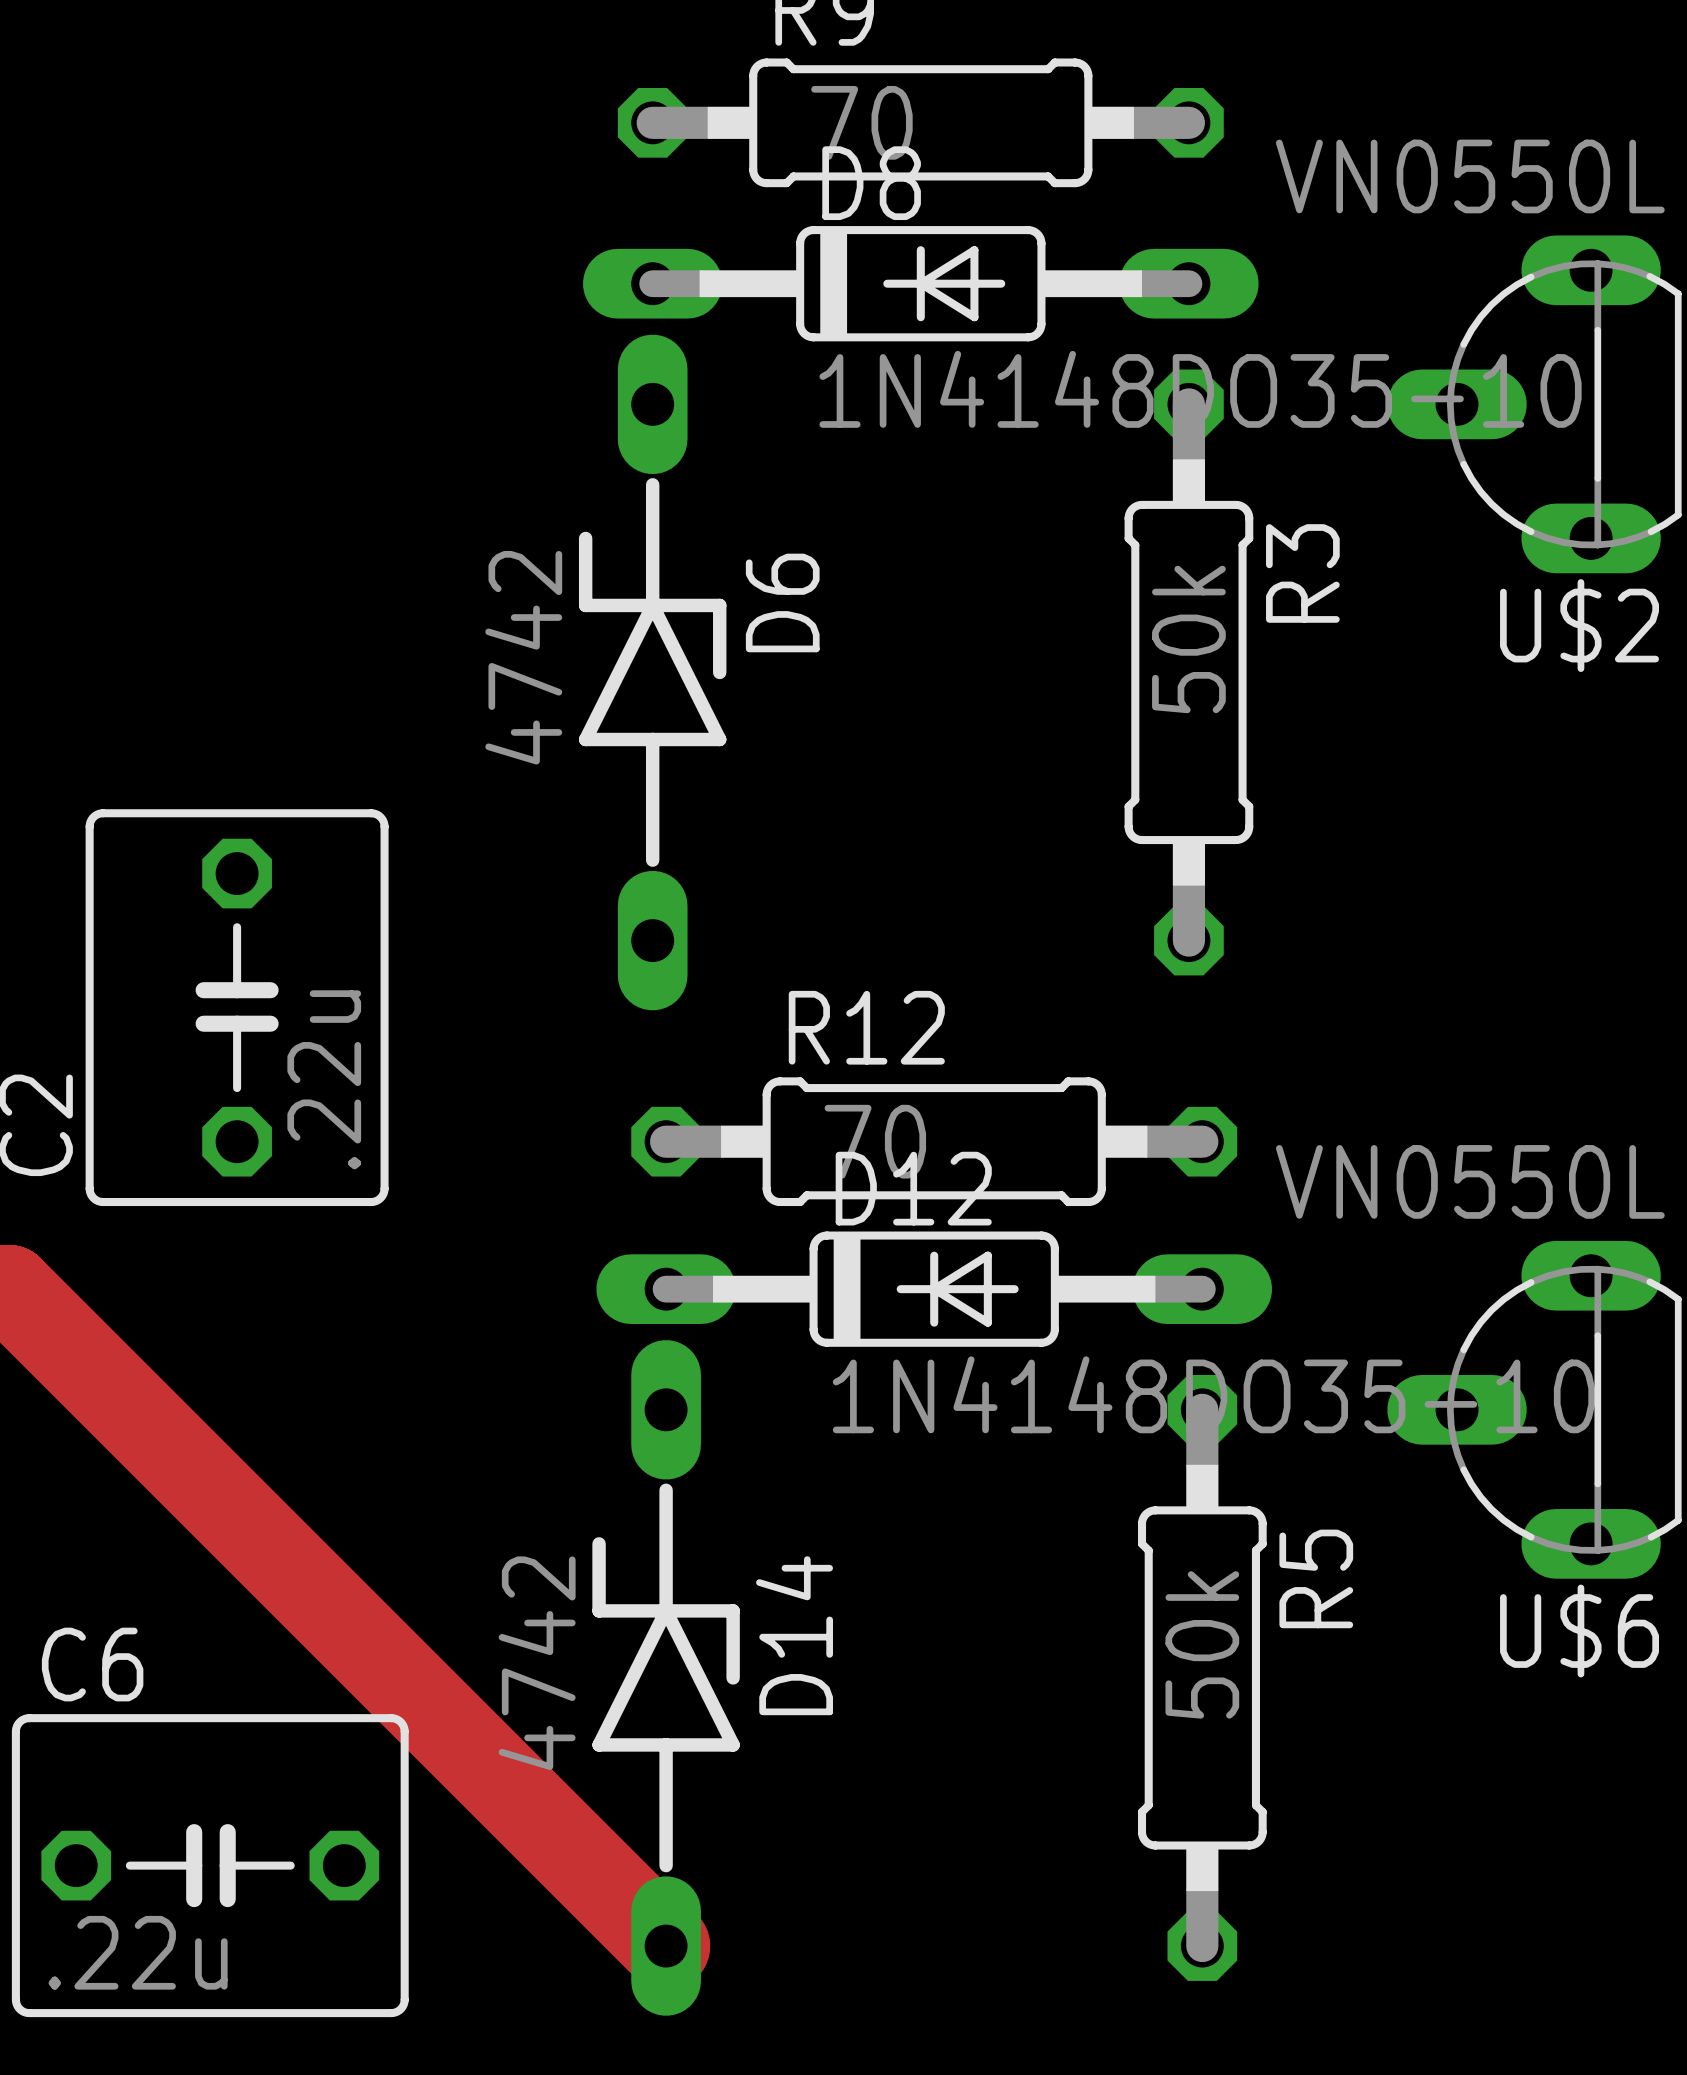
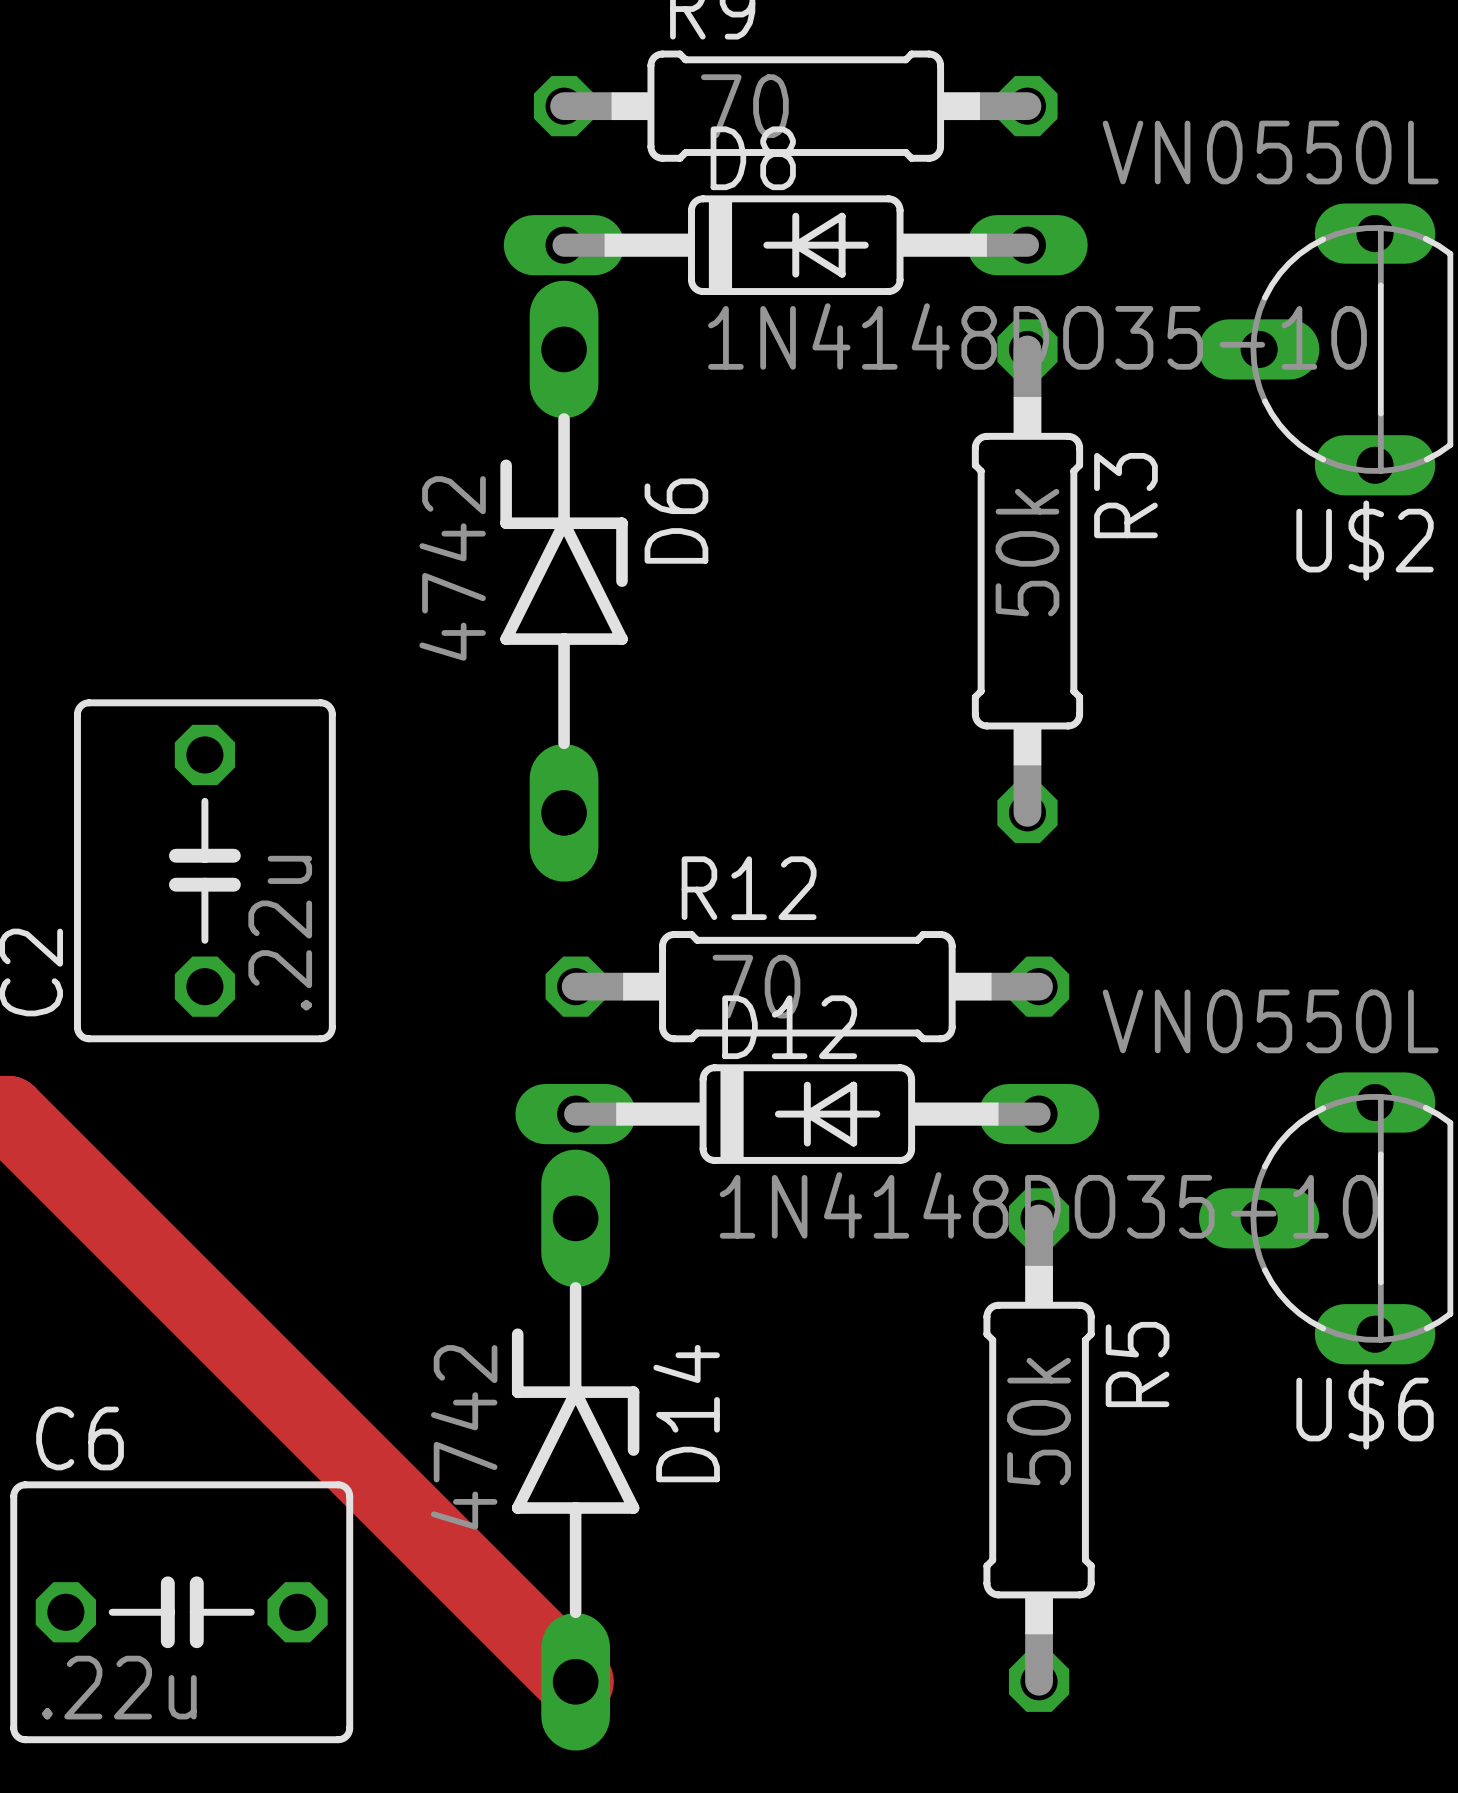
D6 footprint: [578, 334, 727, 1011] -> [500, 280, 628, 882]
D14 footprint: [592, 1340, 740, 2016] -> [511, 1149, 640, 1751]

